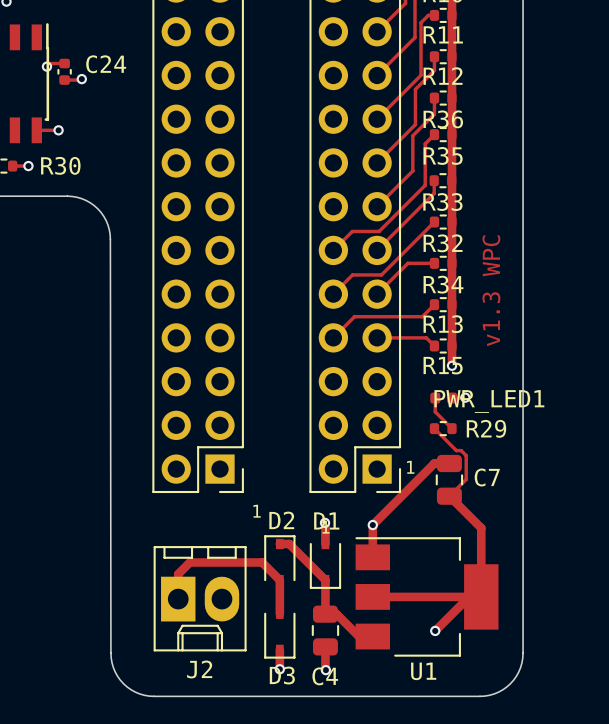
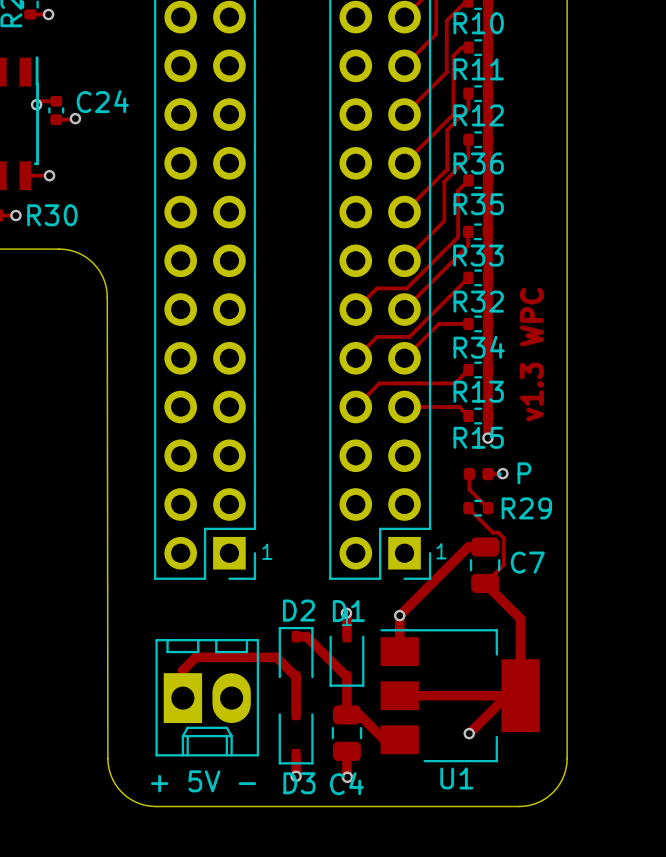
PWR_LED1 name: PWR_LED1 (489, 401) -> P (524, 473)
text position: 1 (257, 511) -> 1 (267, 551)
J2 name: J2 (199, 669) -> + 5V - (203, 781)

